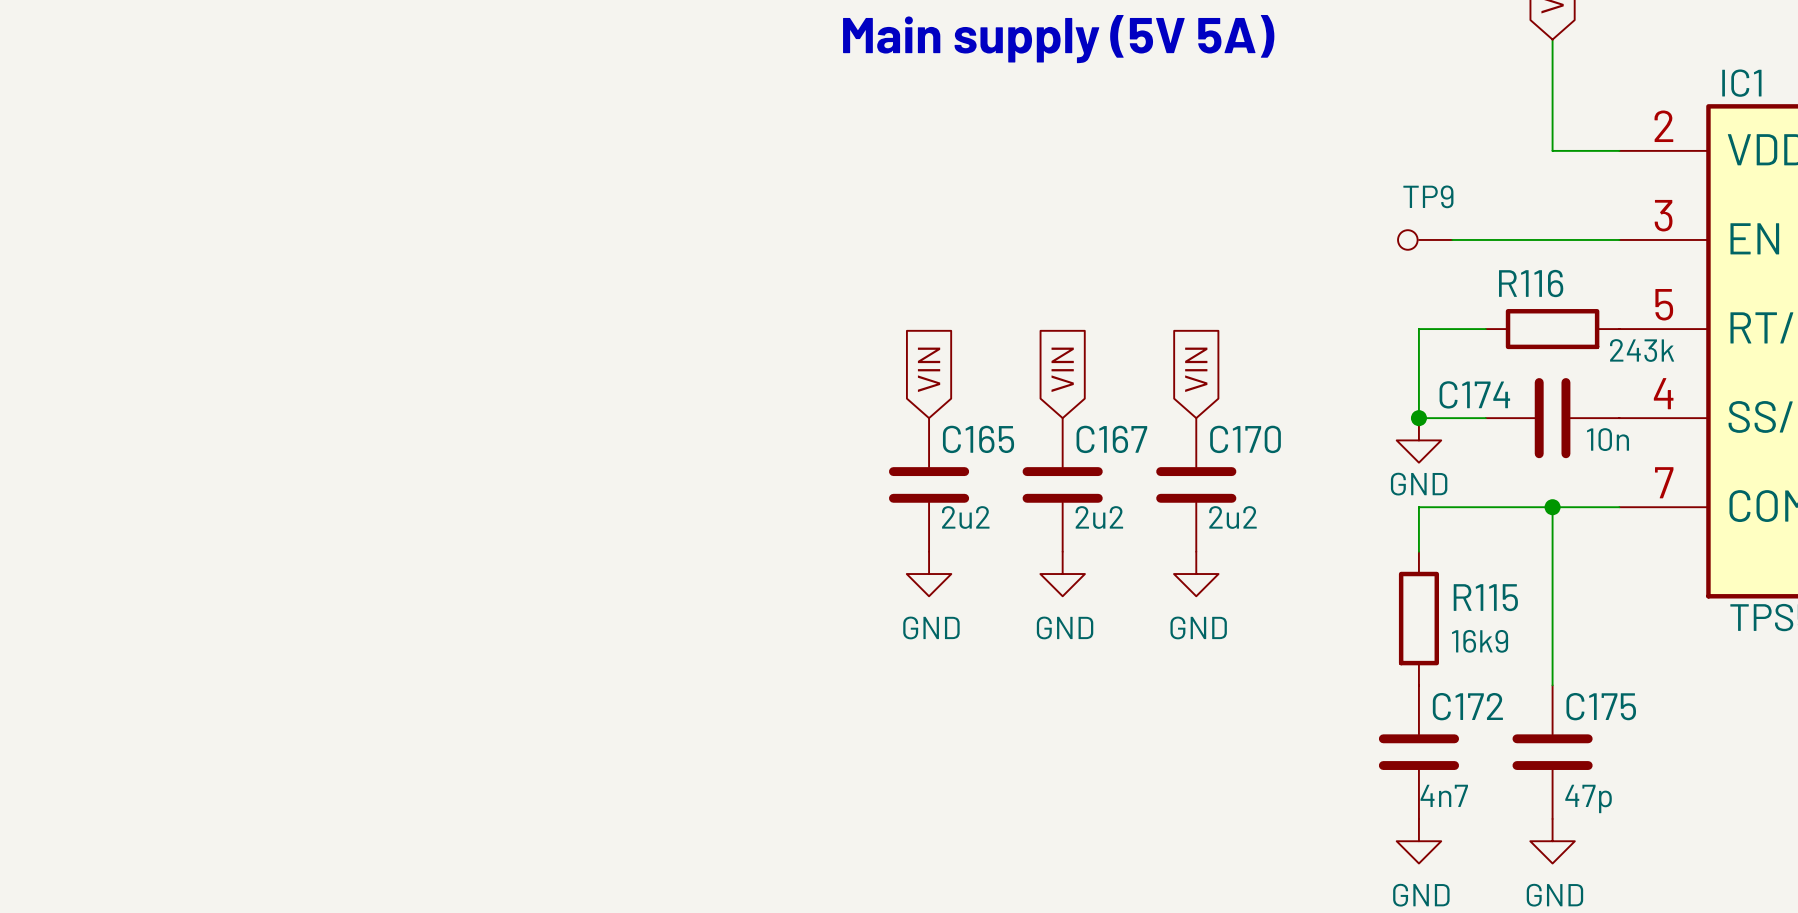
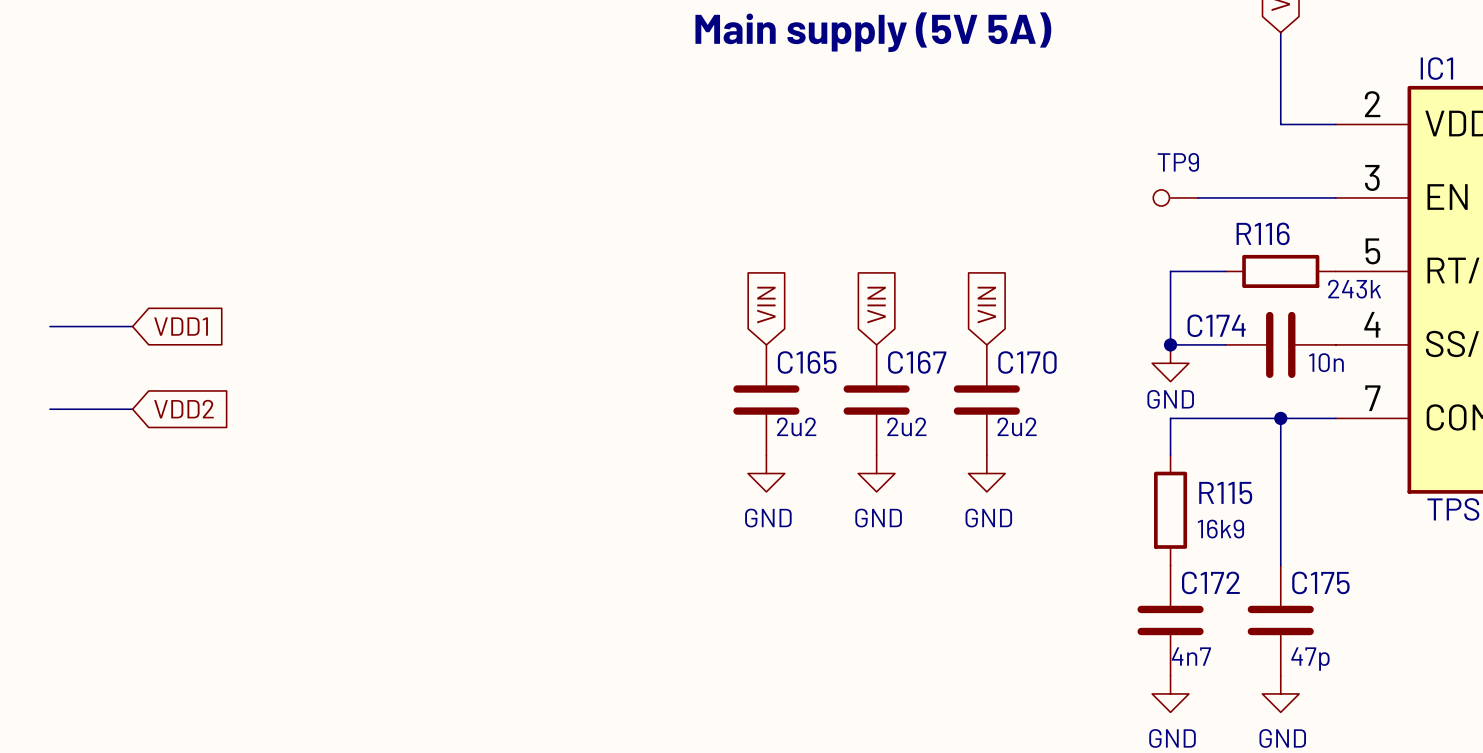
wire: none -> (49, 326) (132, 326)
global label: none -> VDD1 (181, 326)
global label: none -> VDD2 (183, 409)
wire: none -> (49, 409) (132, 409)

